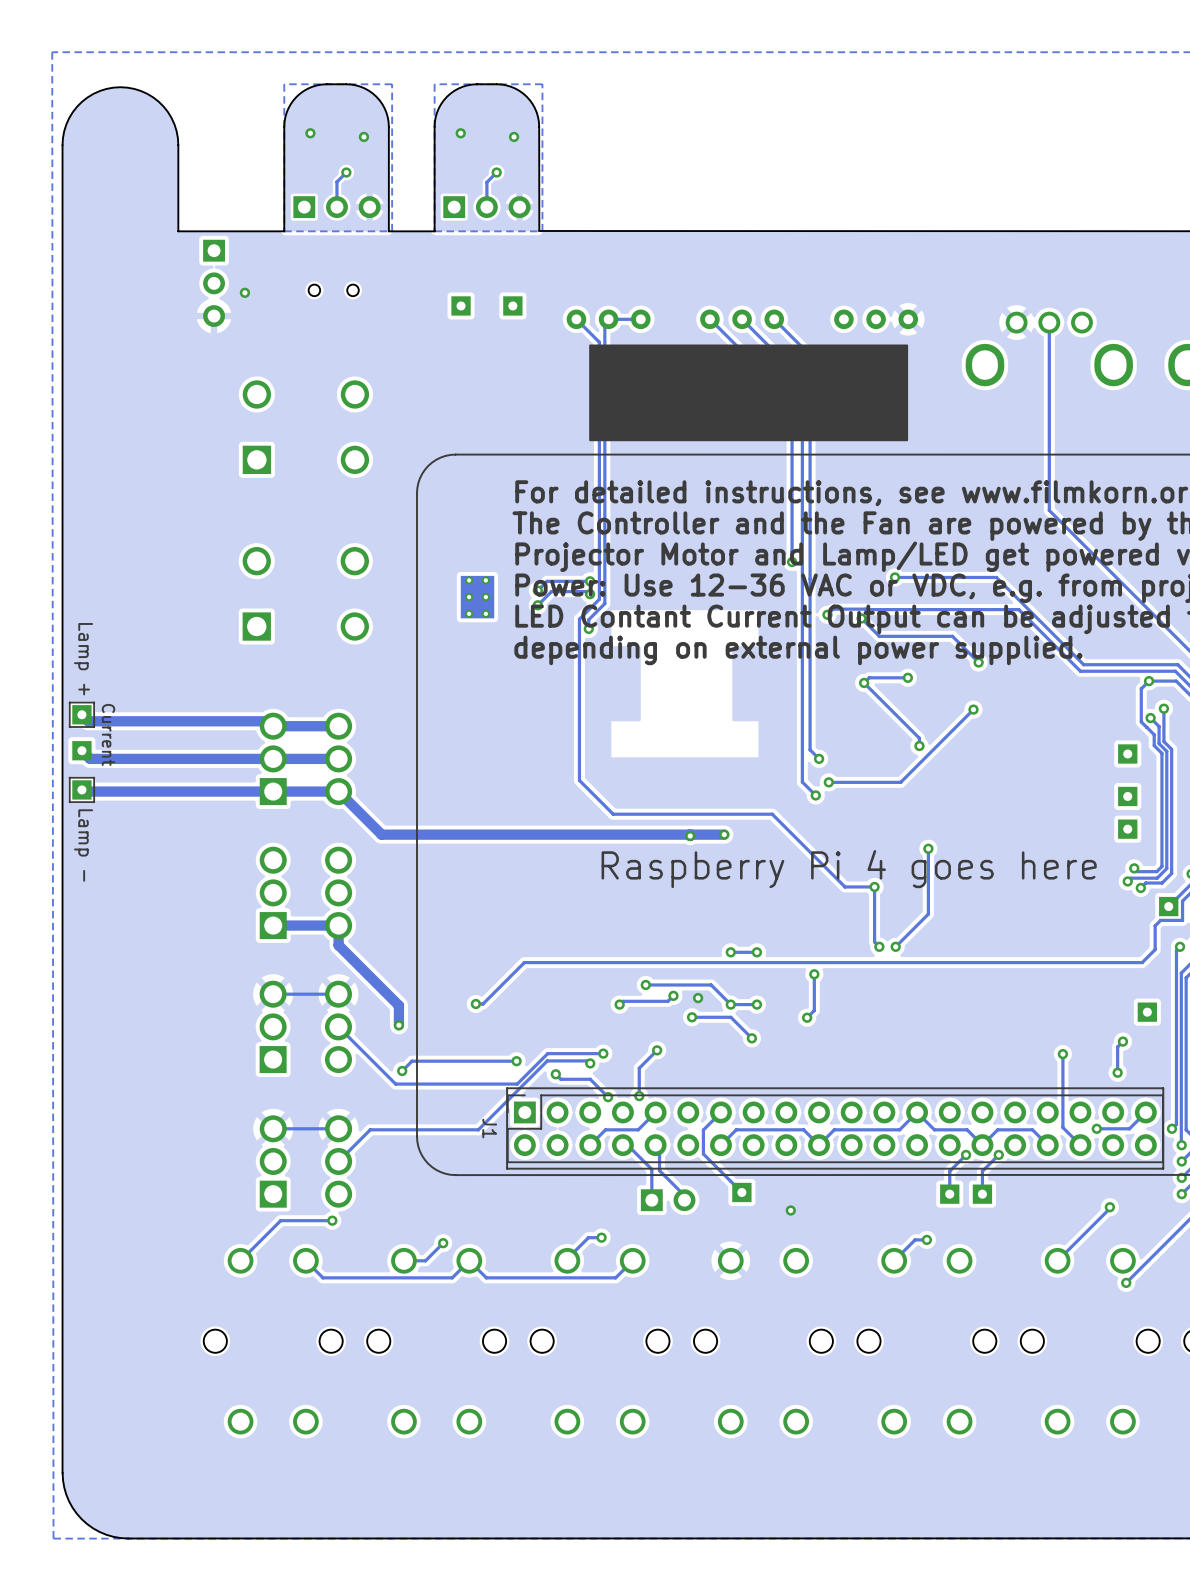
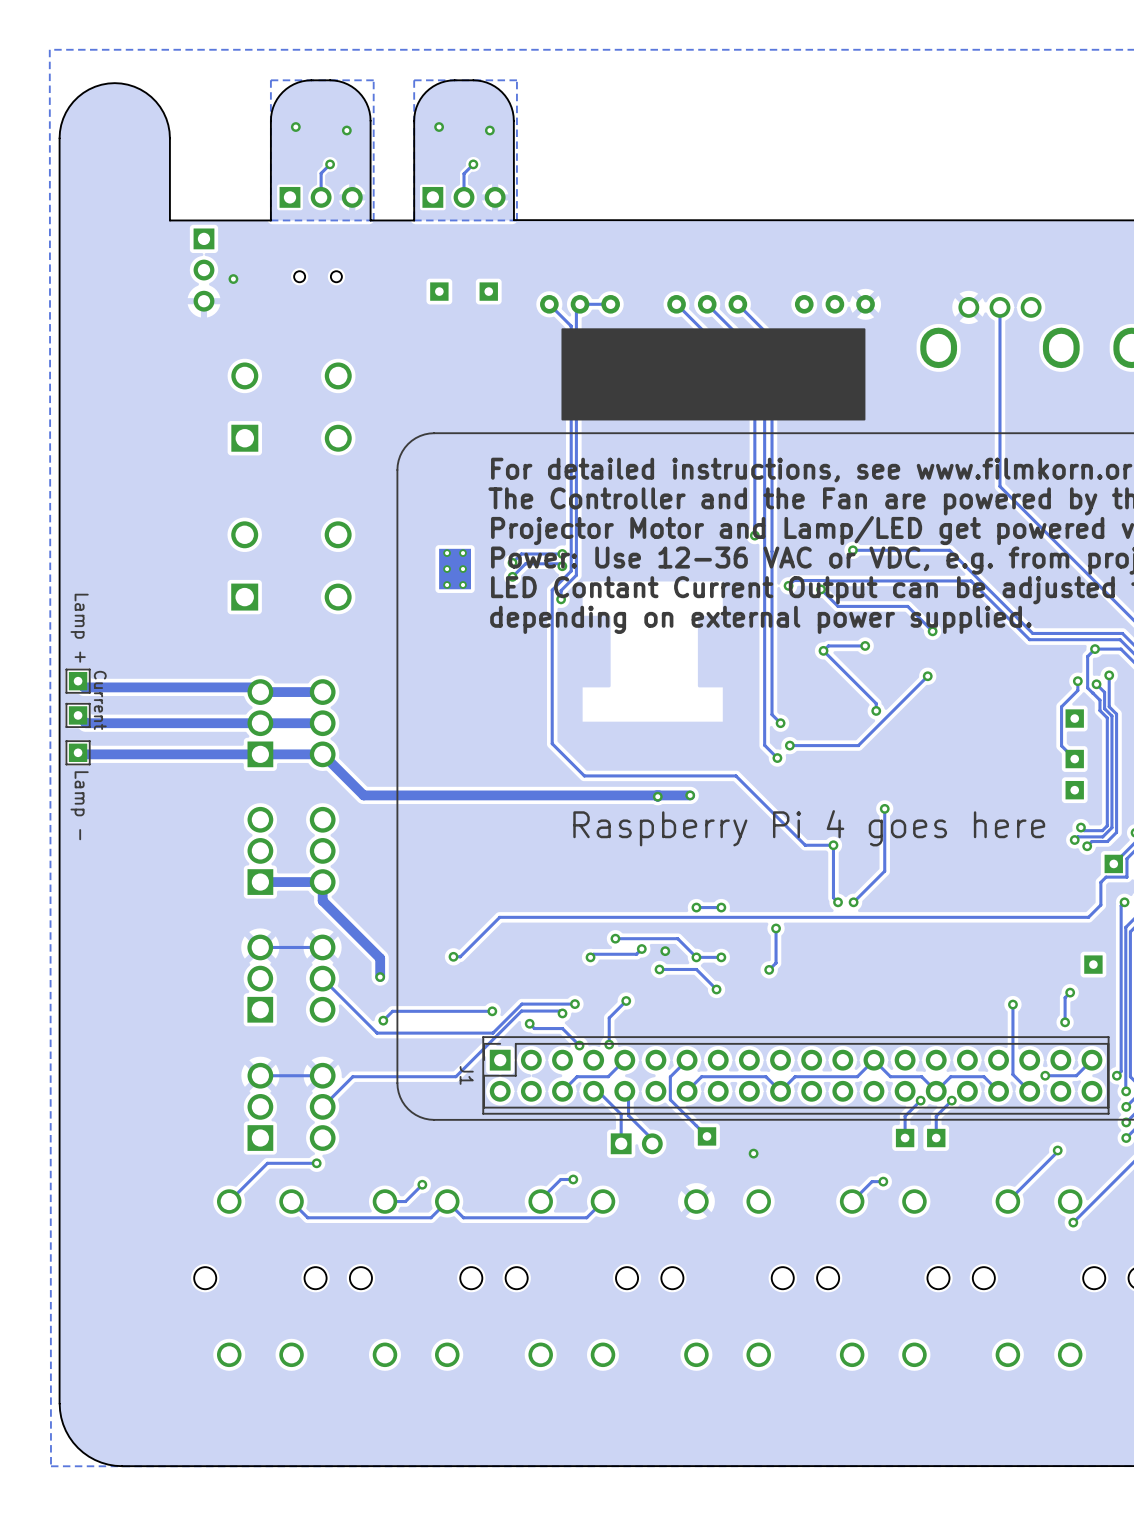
track: none -> (1077, 681) (1077, 690) (1061, 706) (1061, 745) (1074, 759)
via: none -> (1077, 681)
part side: top (81, 750) -> bottom (78, 715)

